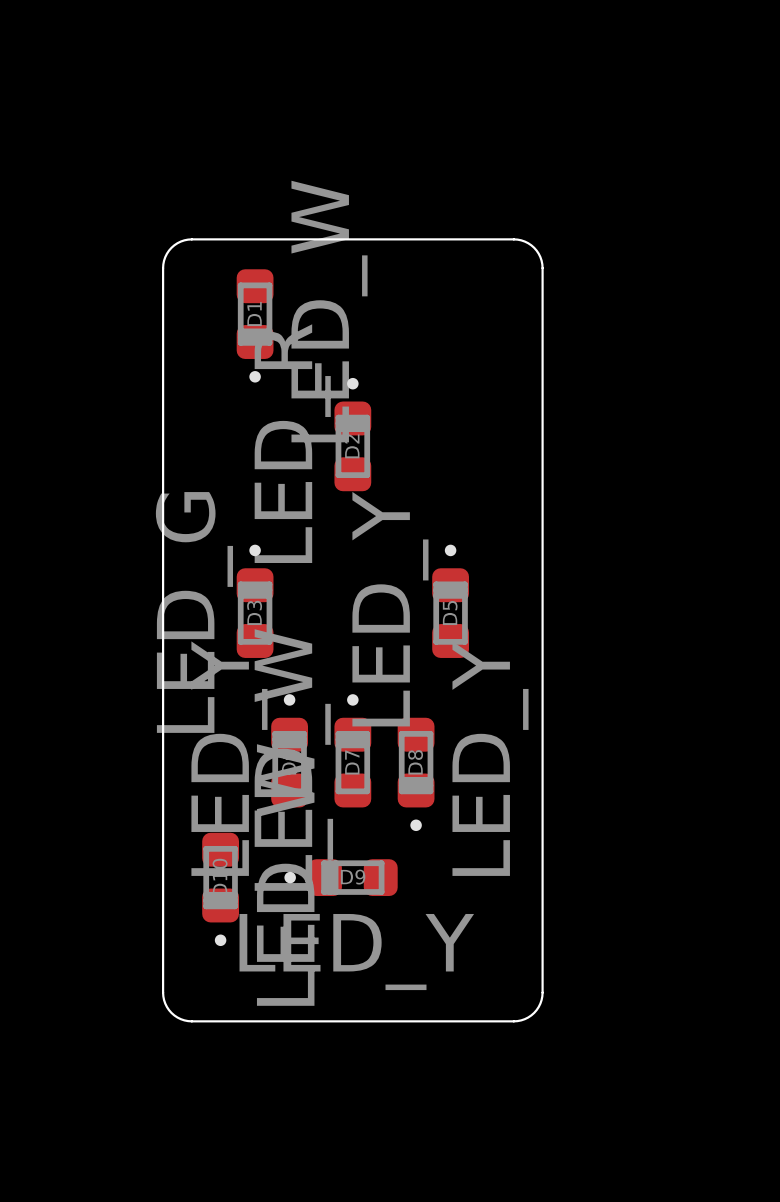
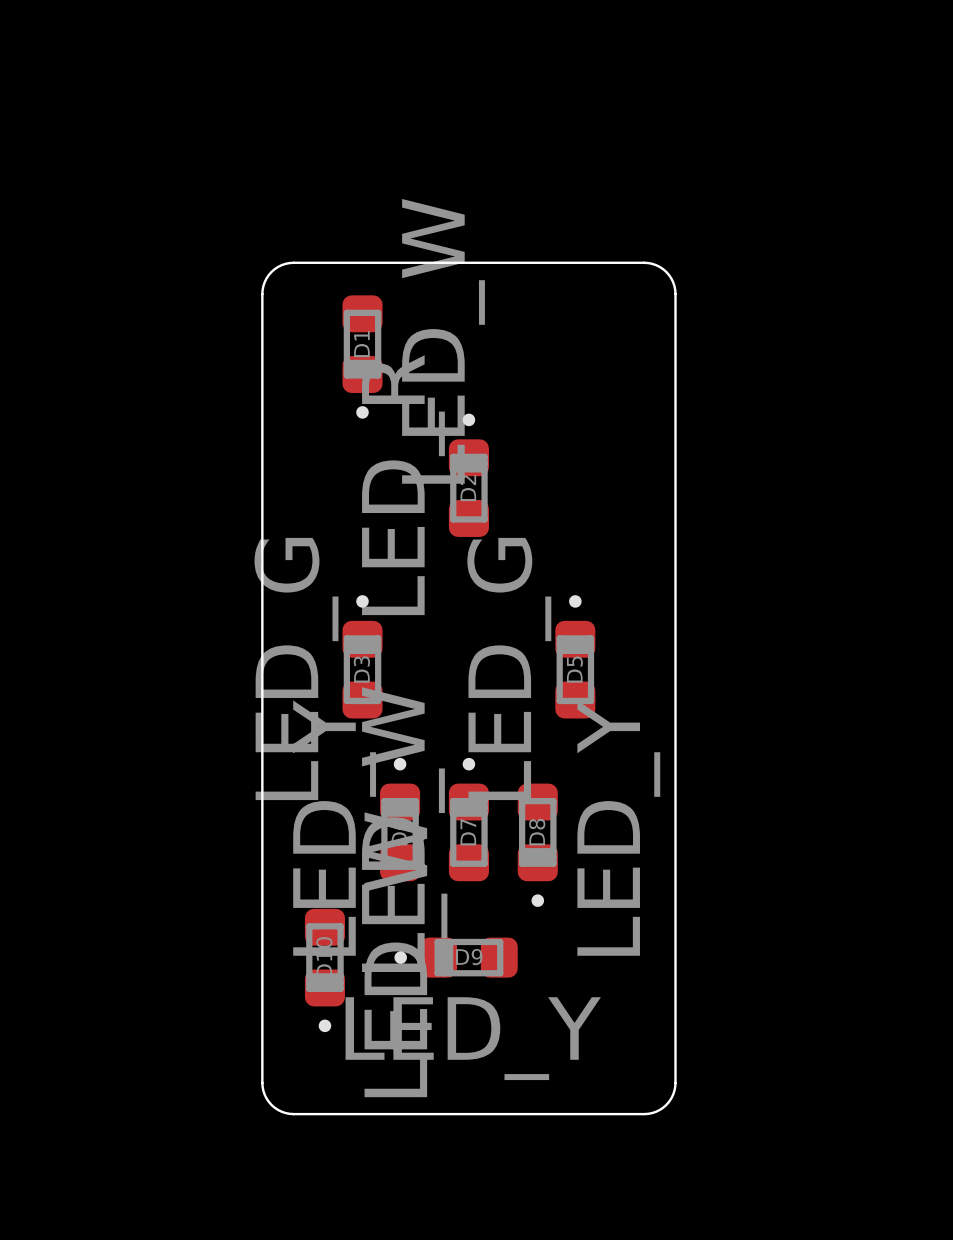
D5 value: LED_Y (390, 609) -> LED_G (509, 668)

